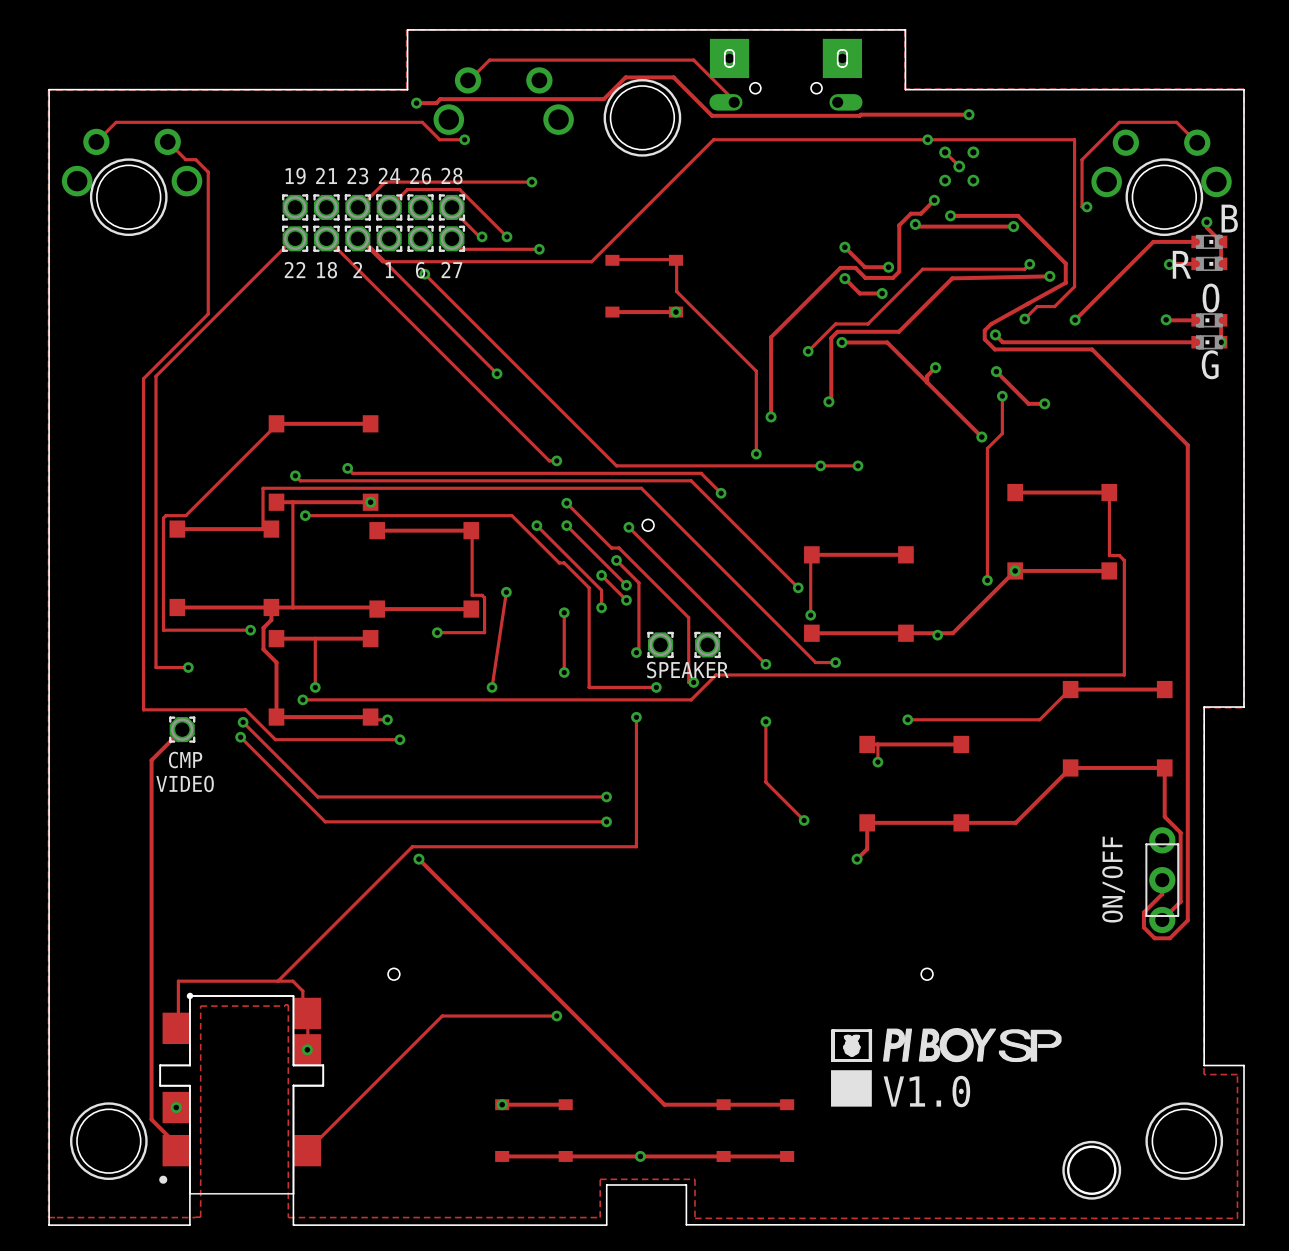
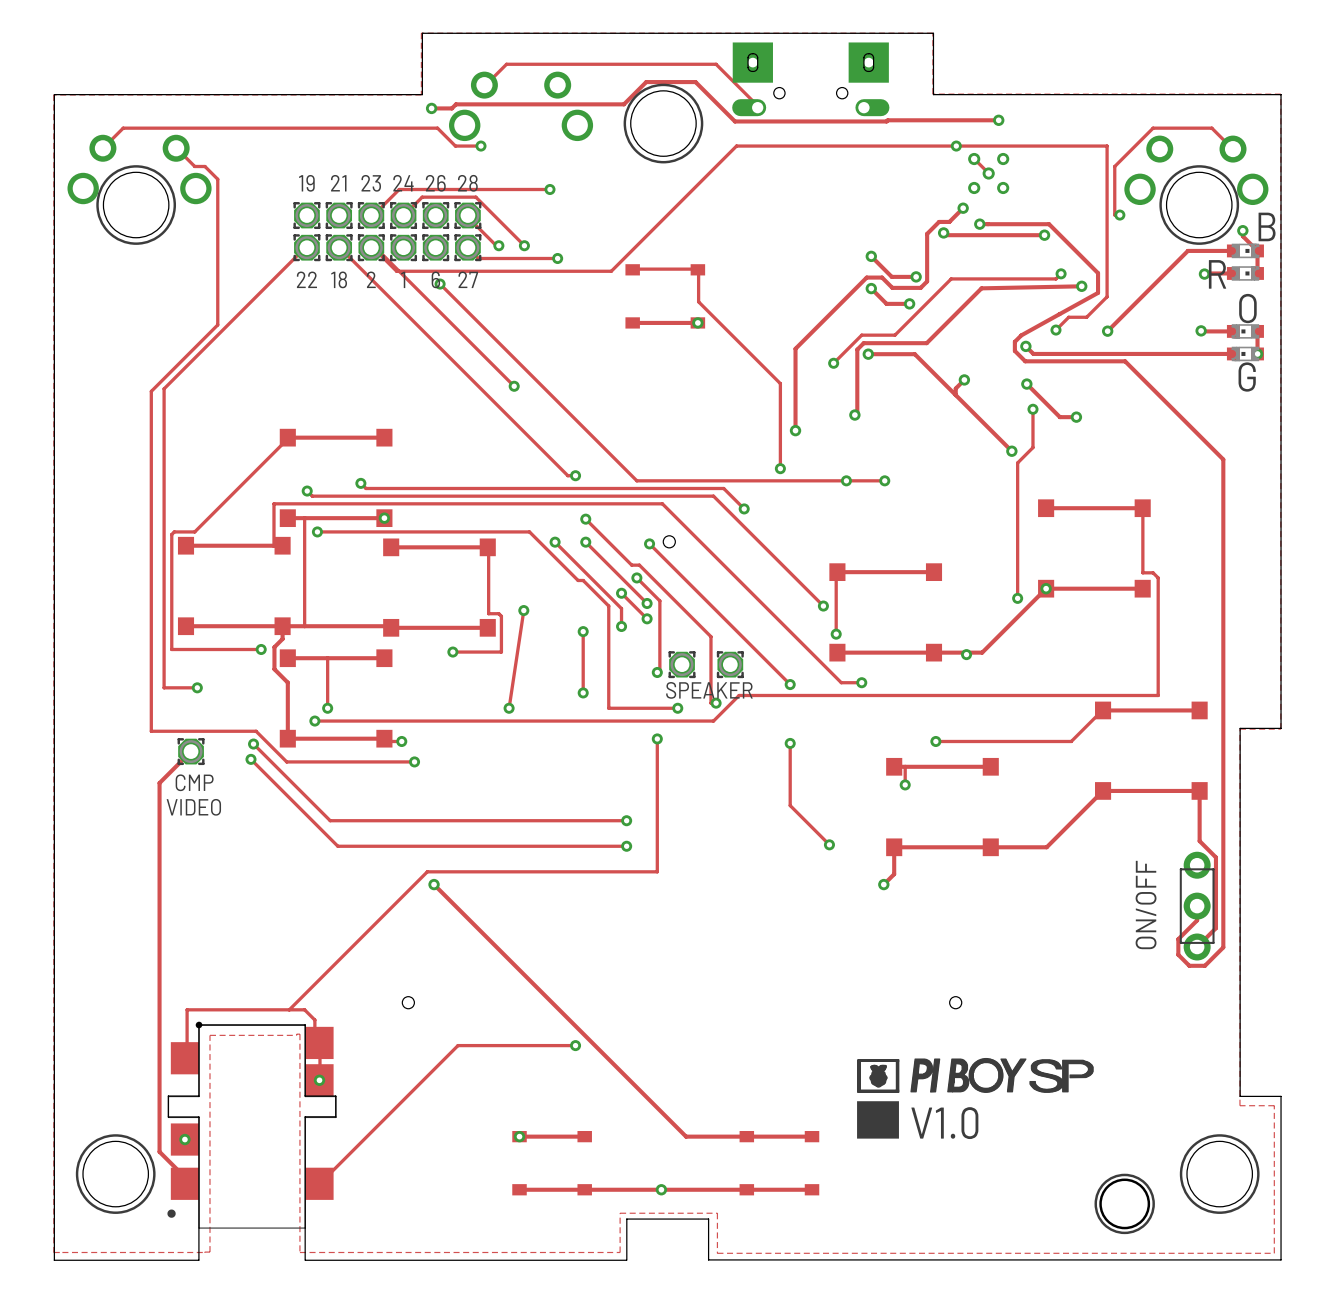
drawing: [944, 1032, 970, 1059] -> none

